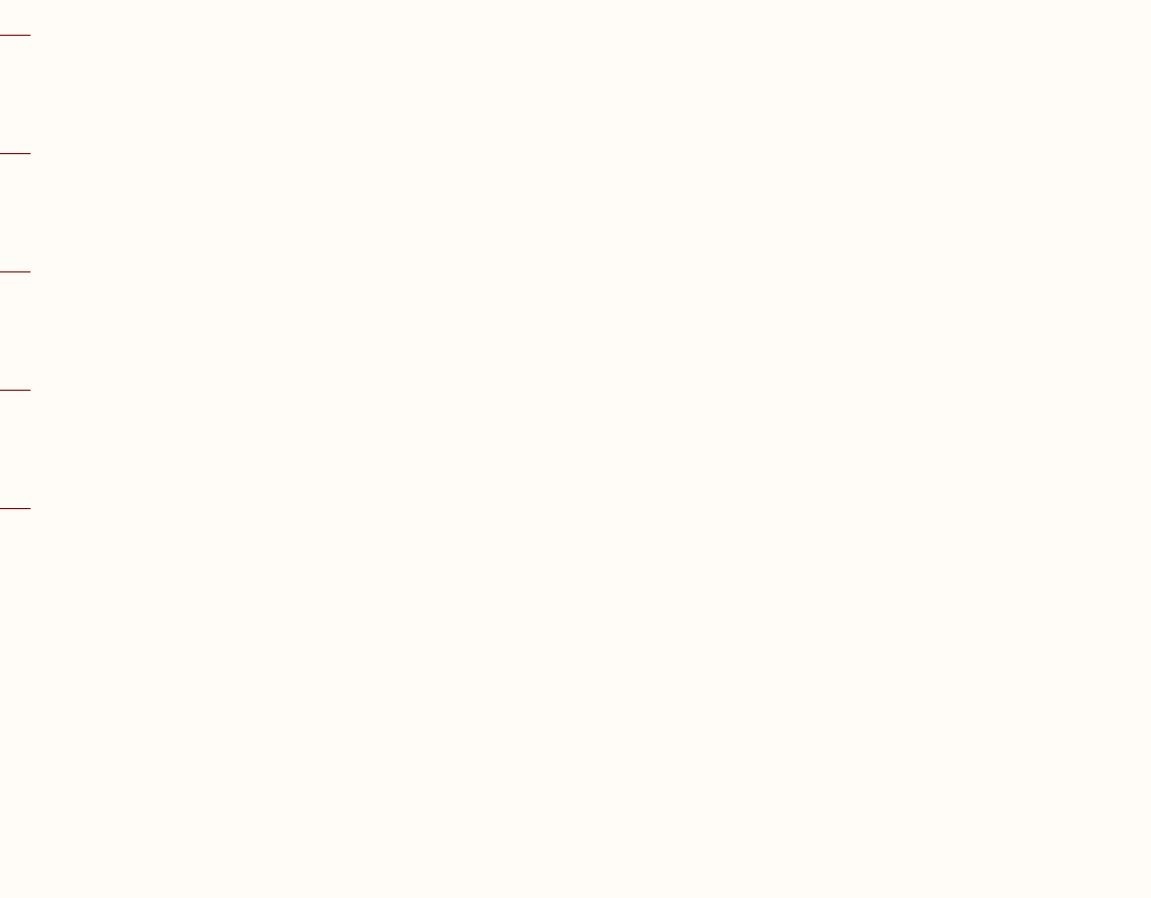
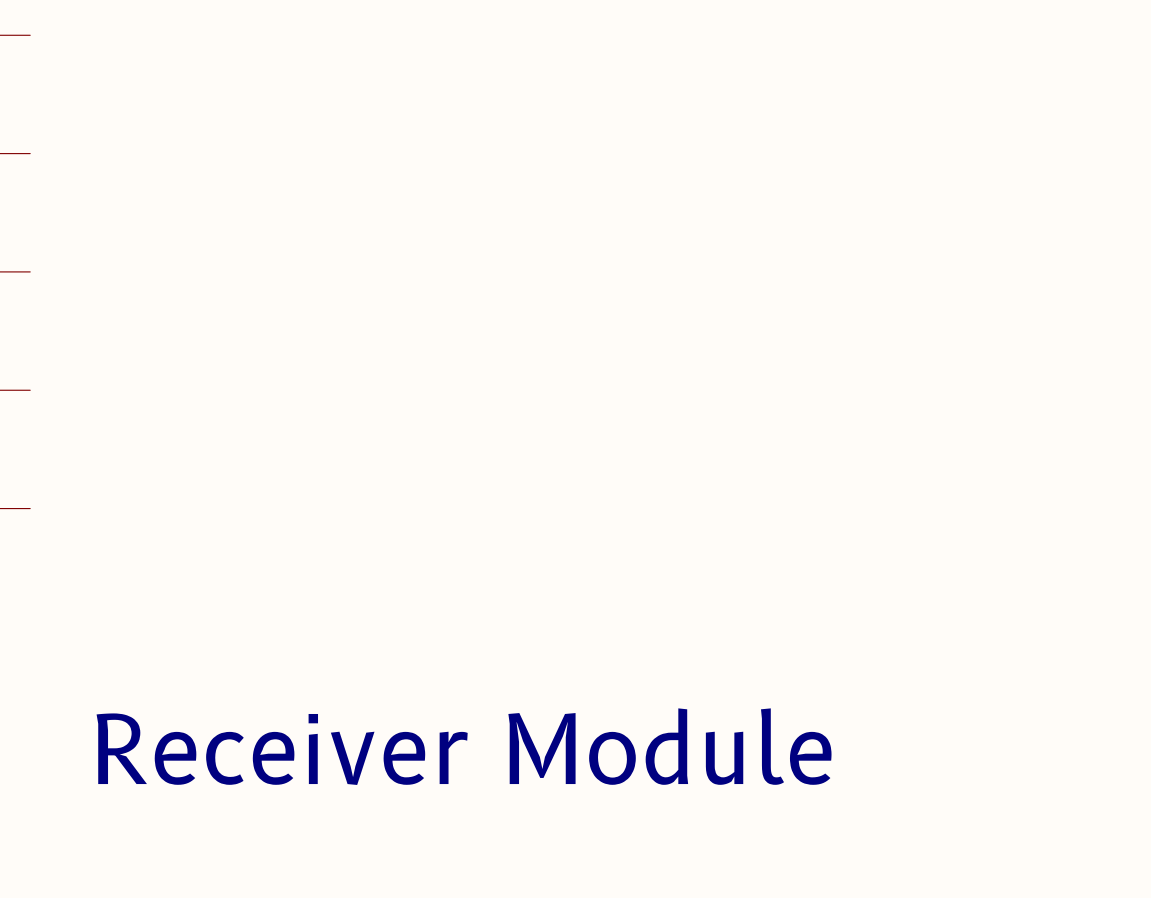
text: none -> Receiver Module (464, 746)

